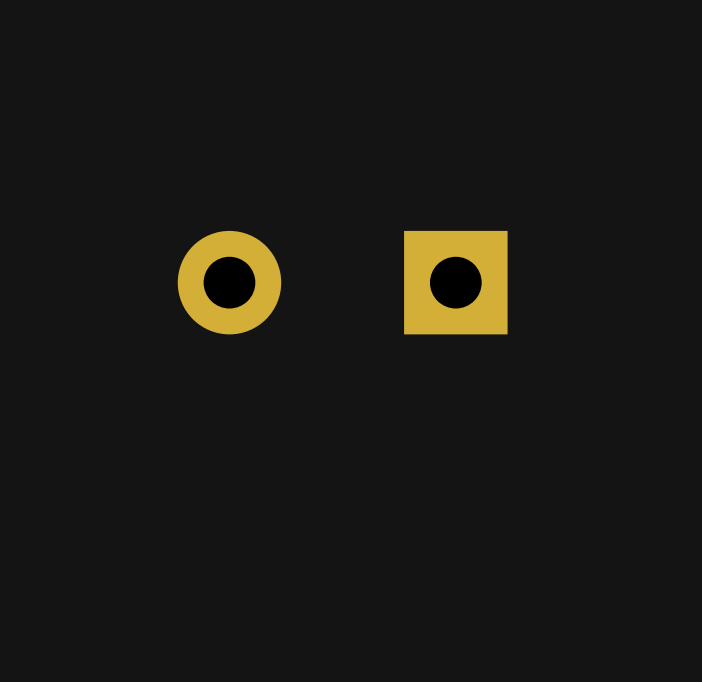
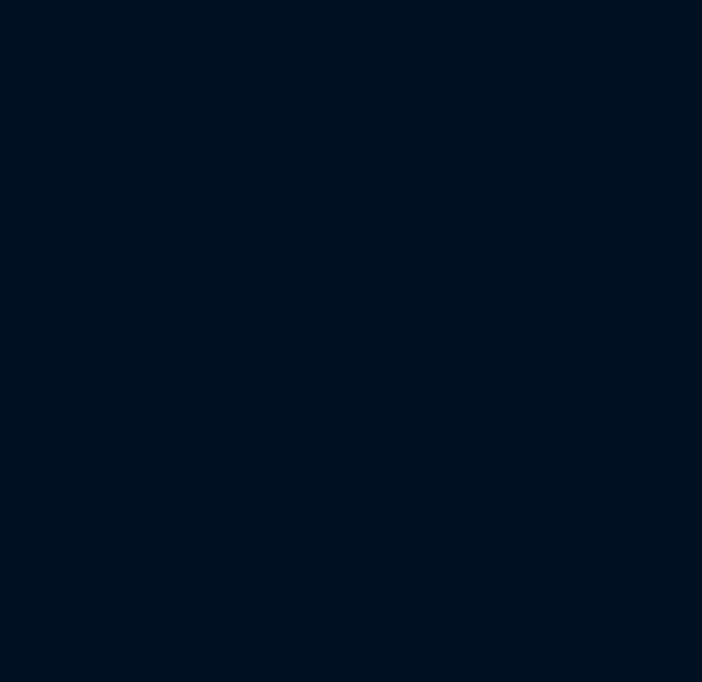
part: (342, 282) -> none

